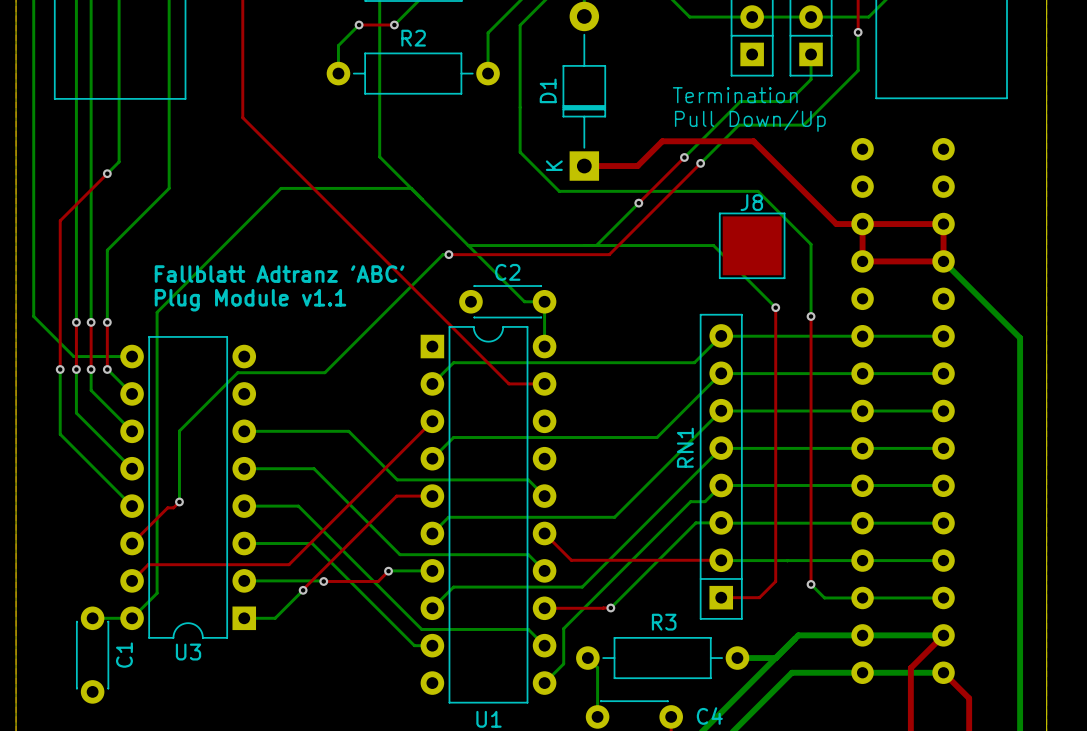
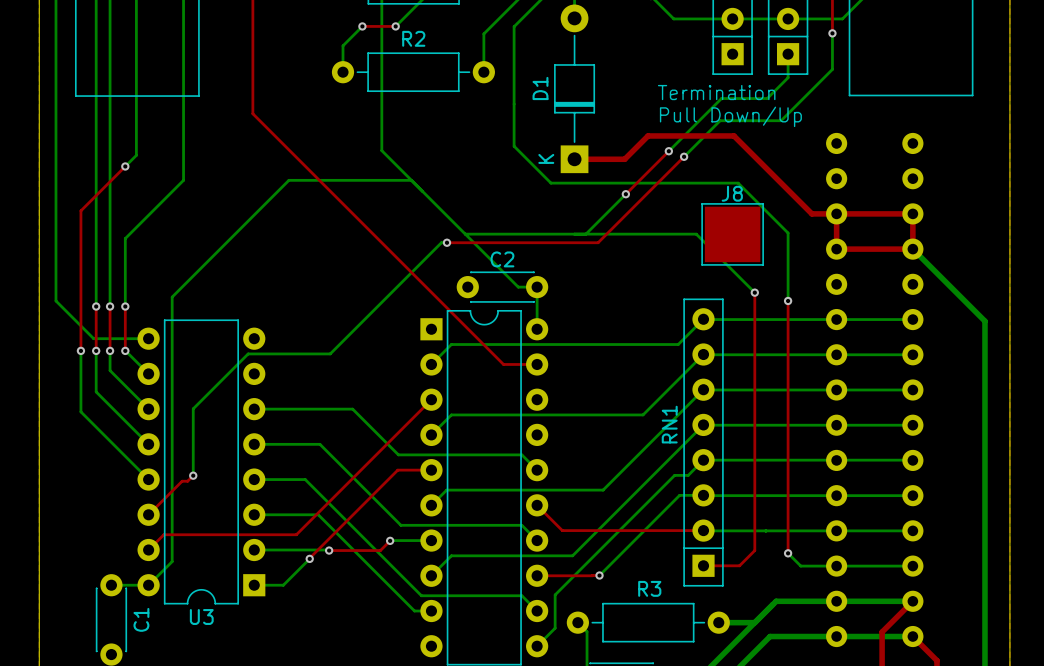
text: Fallblatt Adtranz 'ABC' (279, 274) -> none
text: Plug Module v1.1 (250, 300) -> none

